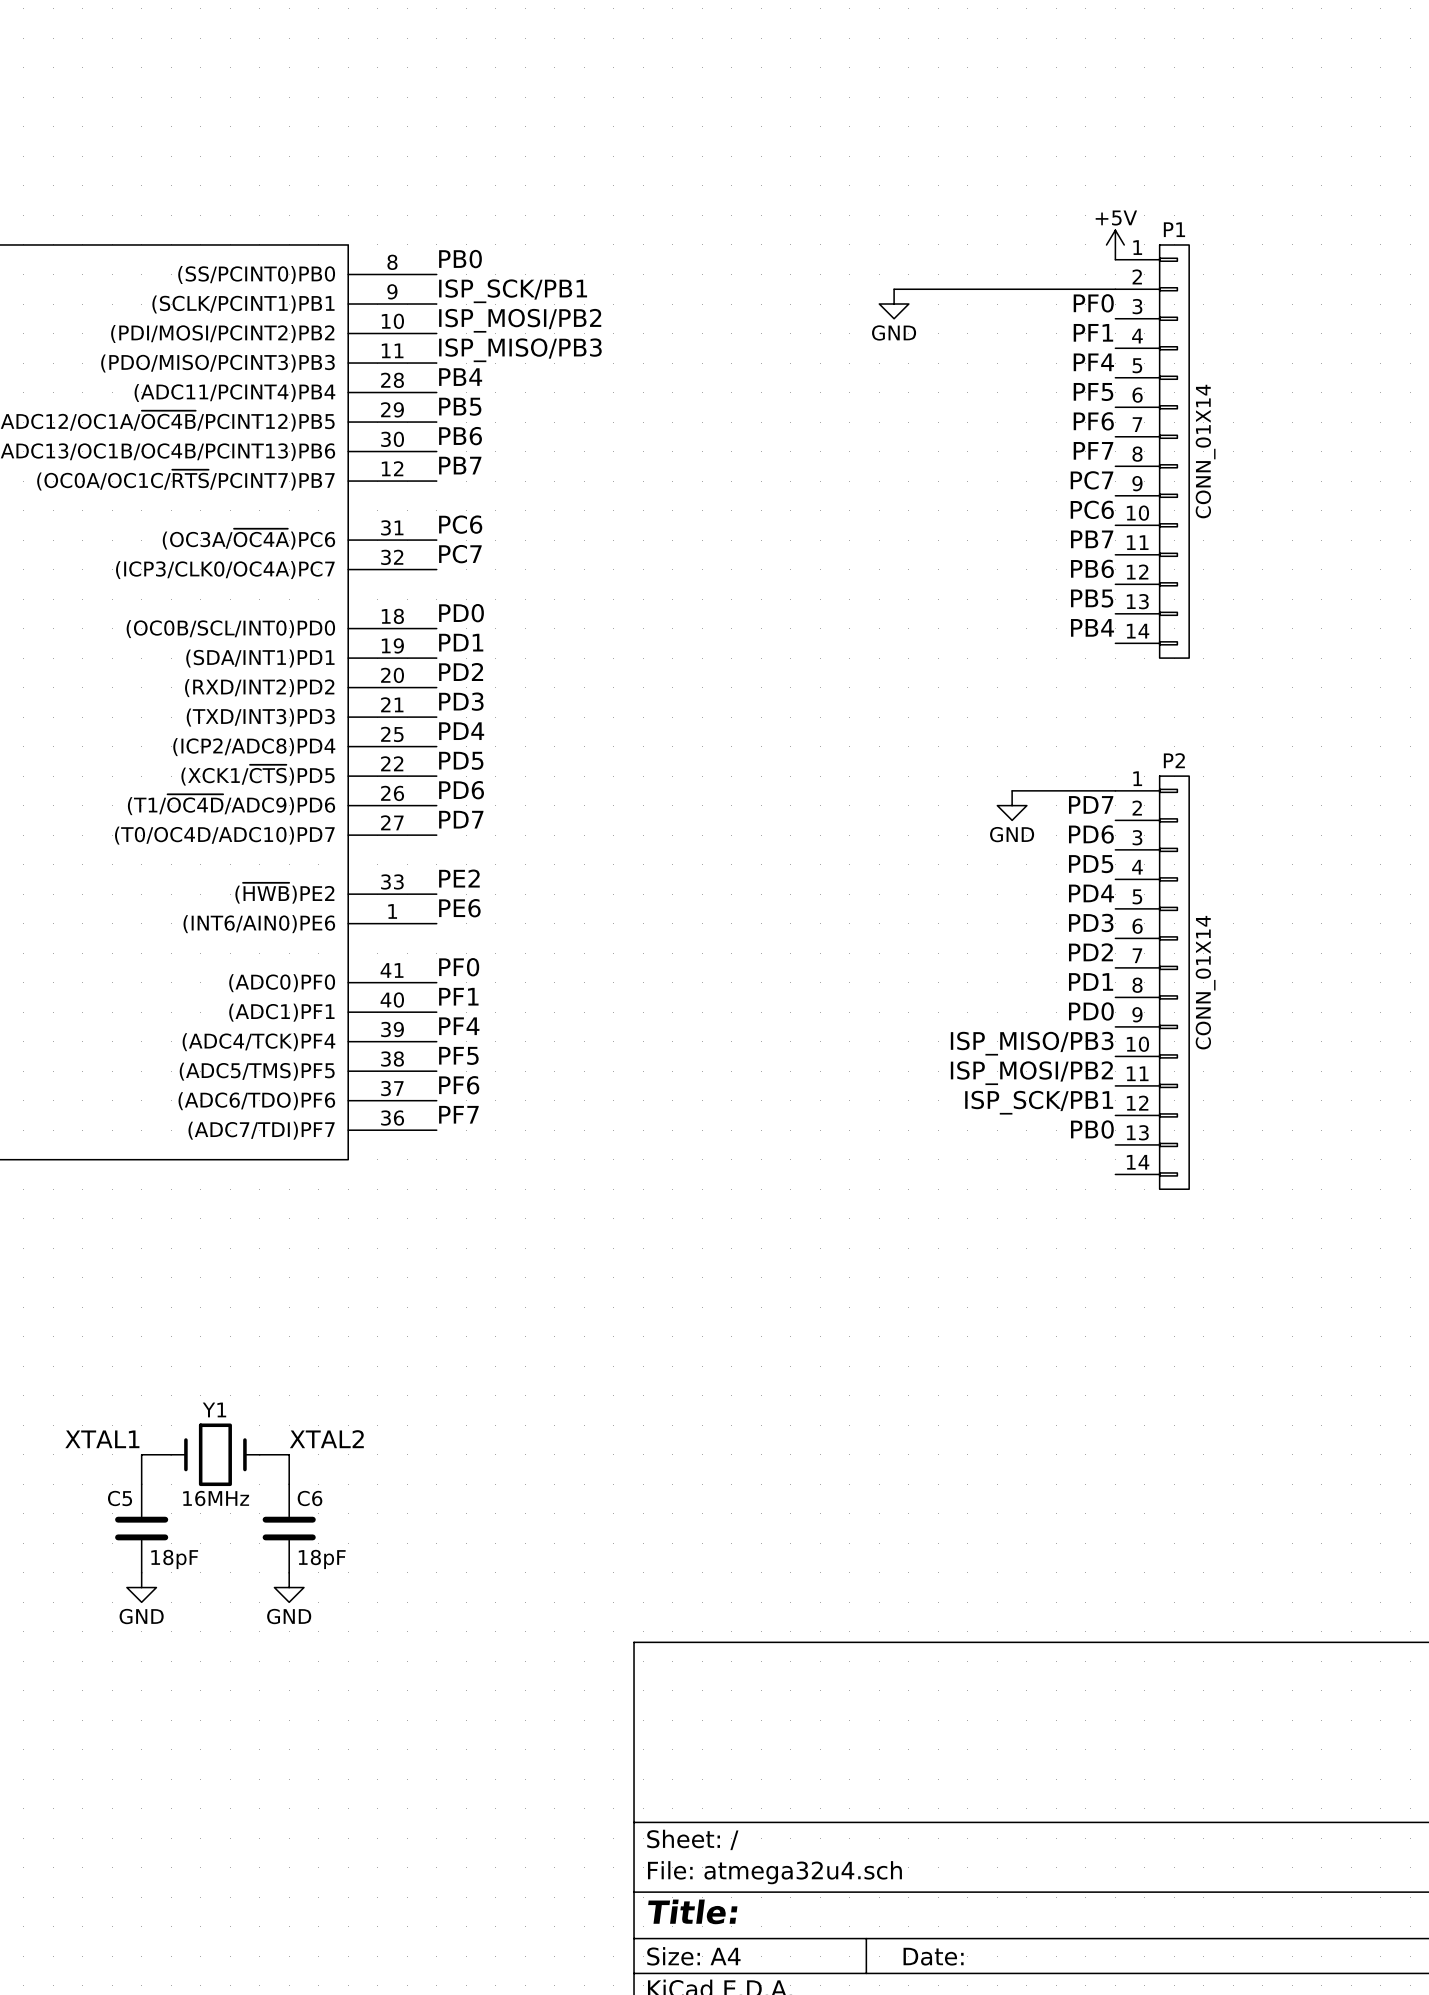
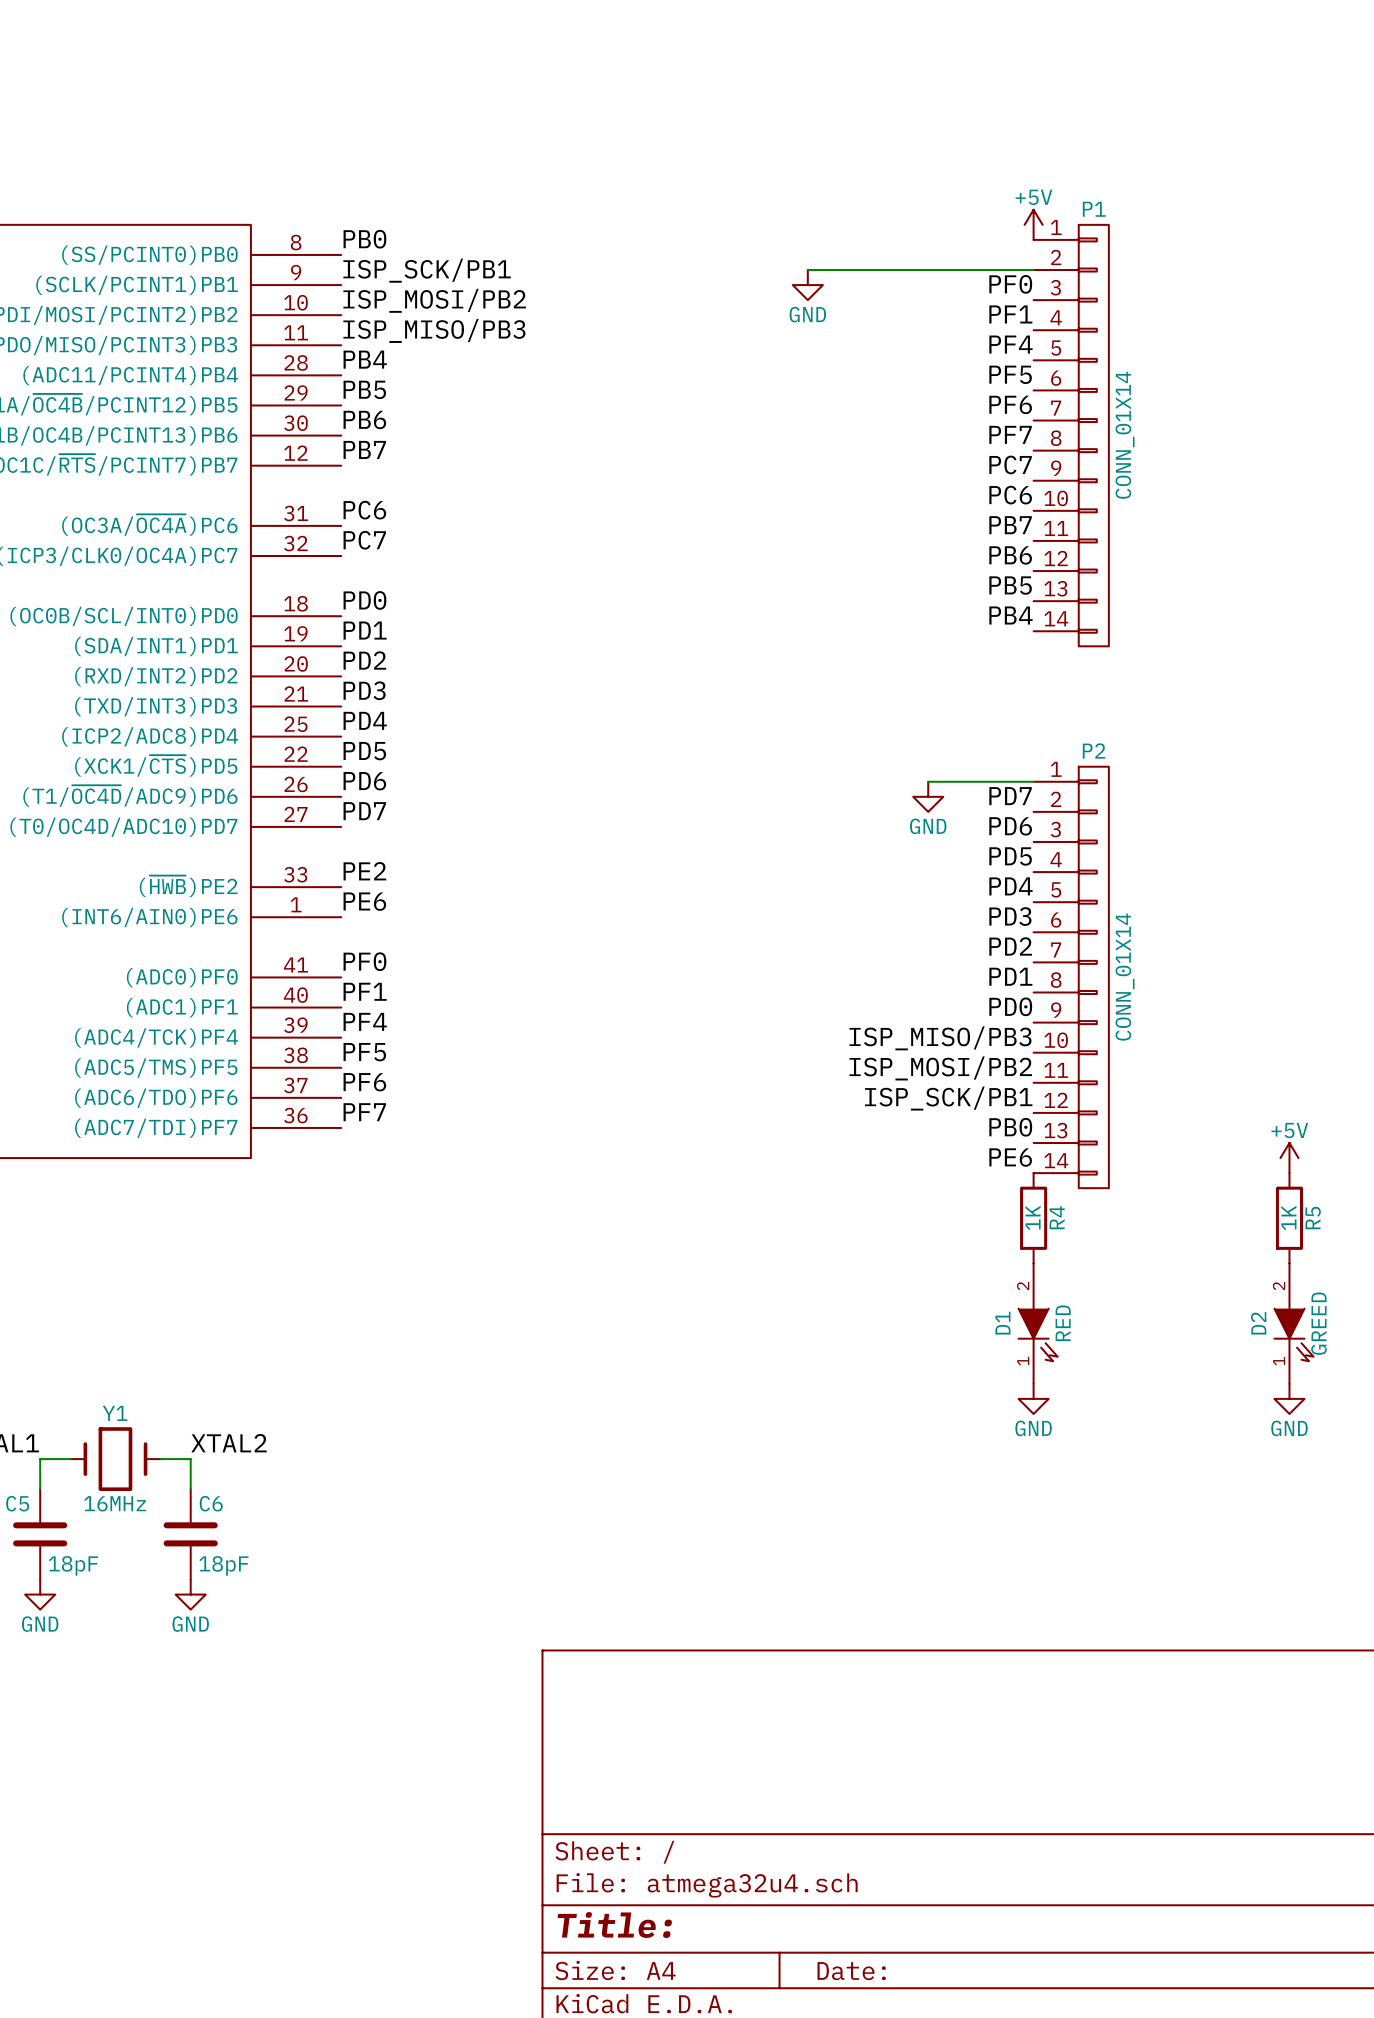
label: none -> PE6 (1010, 1157)
power symbol: none -> +5V (1289, 1158)
R4: none -> 1K (1033, 1218)
R5: none -> 1K (1289, 1218)
D1: none -> RED (1038, 1323)
D2: none -> GREED (1293, 1323)
power symbol: none -> GND (1033, 1398)
power symbol: none -> GND (1289, 1398)

